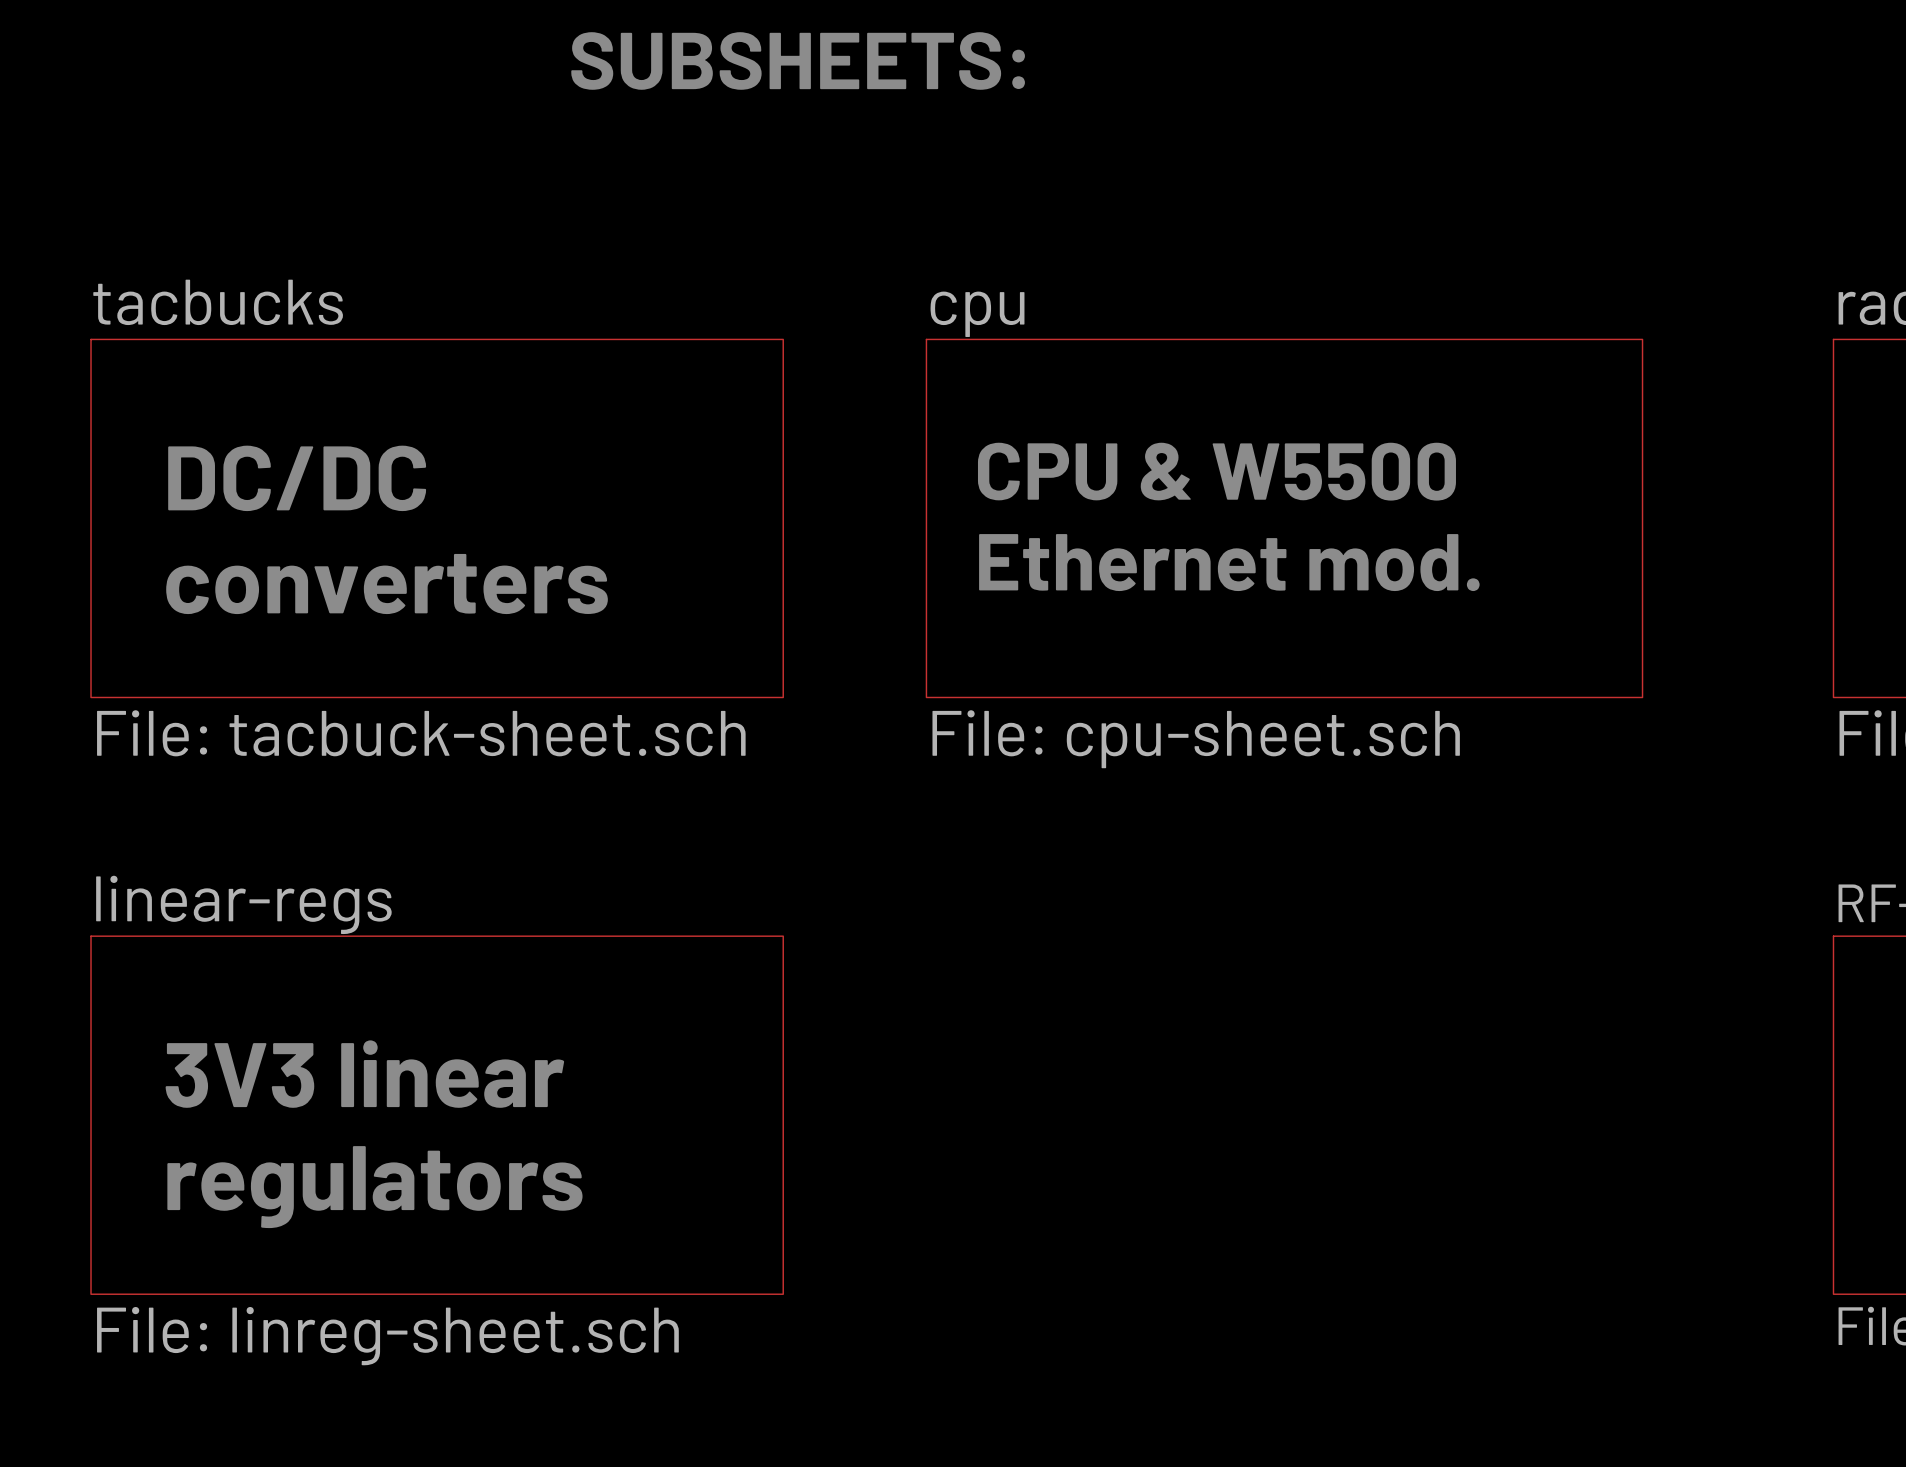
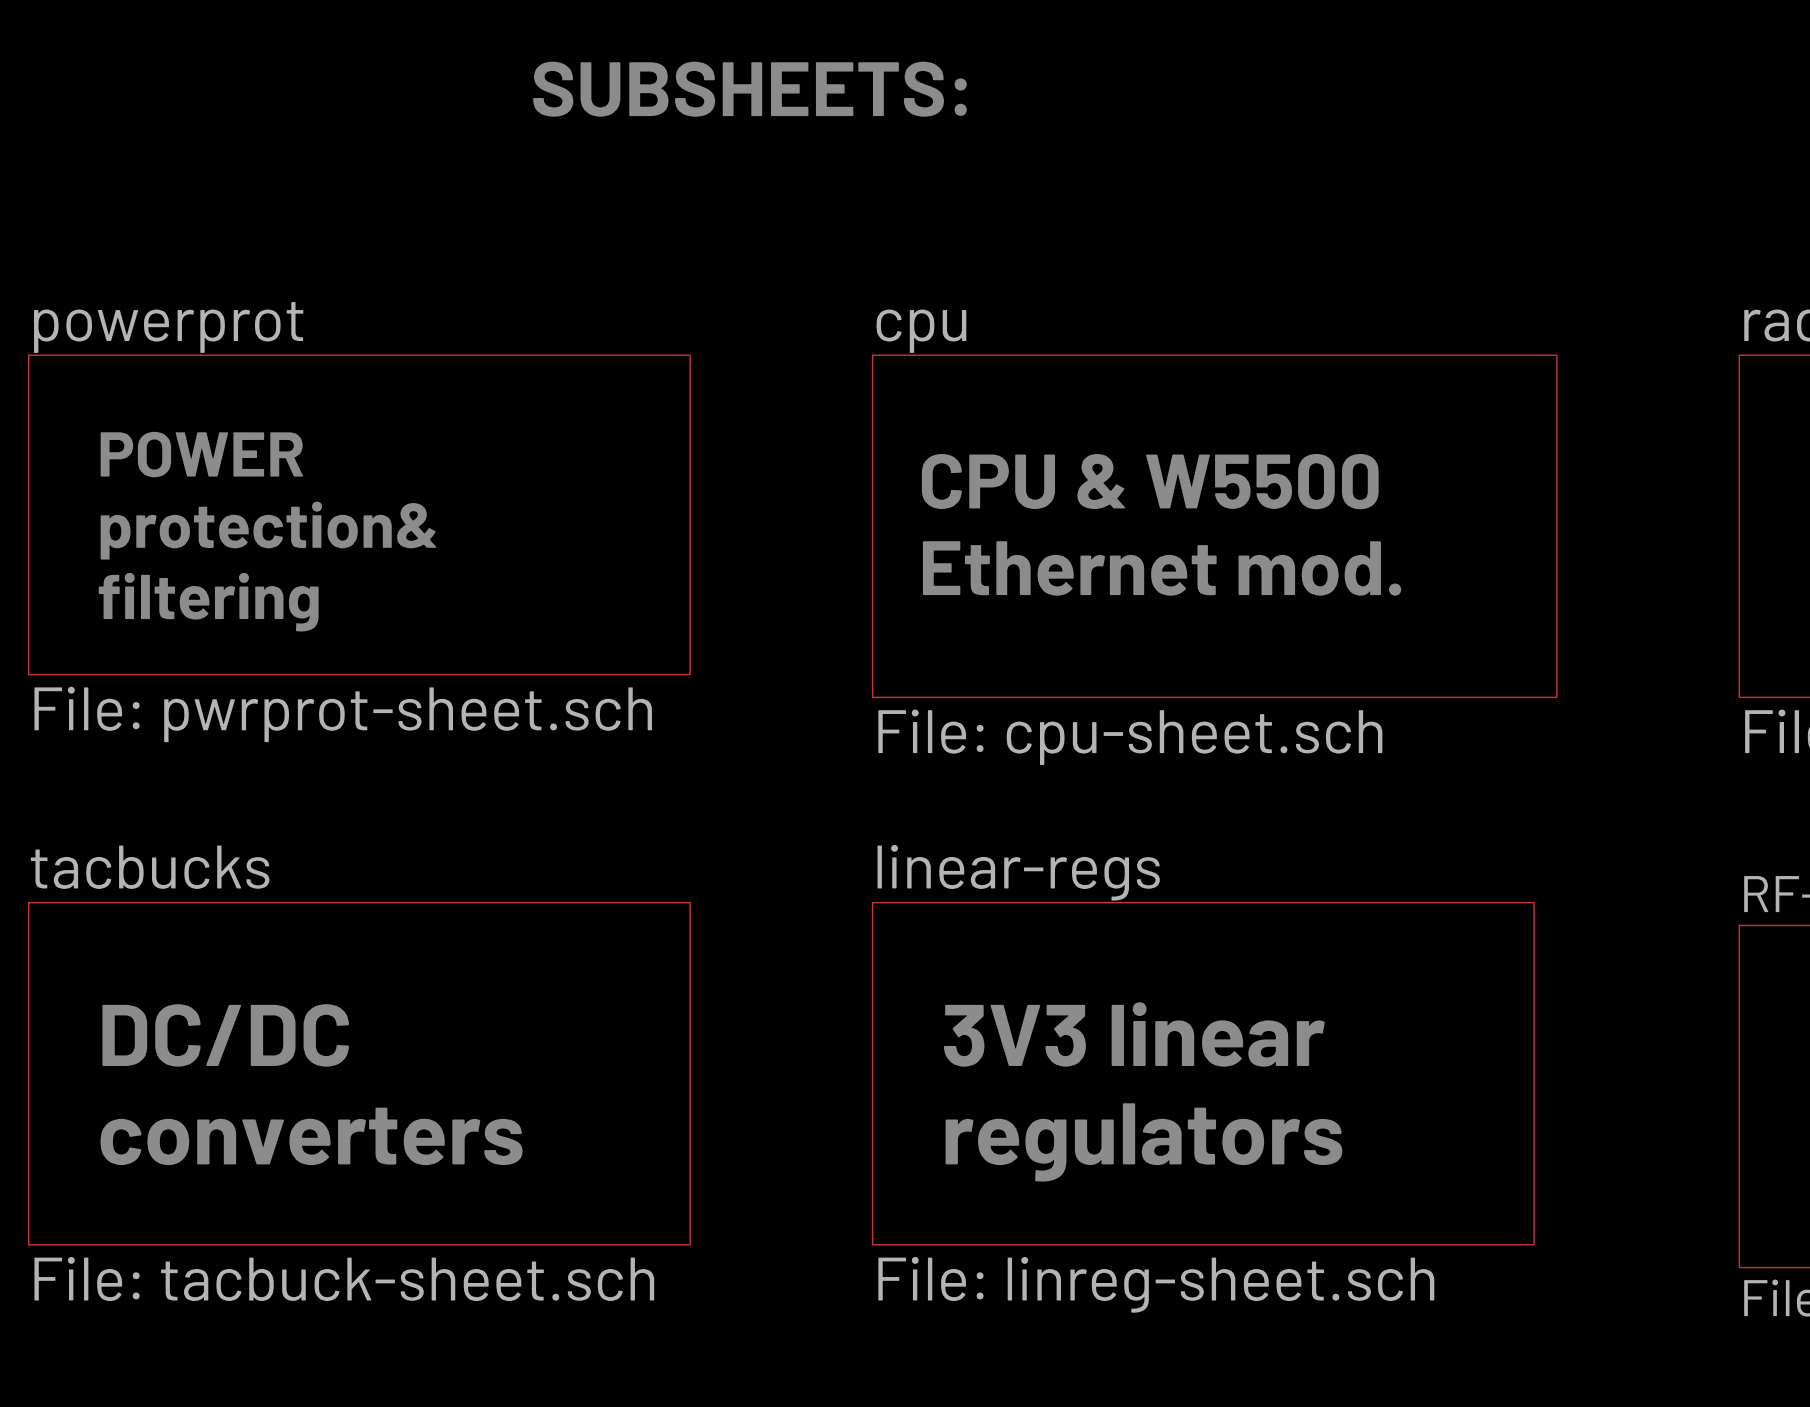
text: none -> POWER (201, 454)
text: DC/DC (297, 478) -> none
sheet powerprot: none -> File: pwrprot-sheet.sch (359, 514)
sheet tacbucks: File: tacbuck-sheet.sch (437, 518) -> none
text: none -> protection& (268, 530)
text: converters (387, 584) -> none
text: none -> filtering (208, 602)
text: none -> 3V3 linear (1134, 1034)
text: none -> DC/DC (225, 1035)
text: 3V3 linear (364, 1074) -> none
sheet tacbucks: none -> File: tacbuck-sheet.sch (359, 1073)
sheet linear-regs: none -> File: linreg-sheet.sch (1203, 1073)
sheet linear-regs: File: linreg-sheet.sch (437, 1115) -> none
text: none -> converters (311, 1136)
text: none -> regulators (1143, 1142)
text: regulators (374, 1187) -> none

